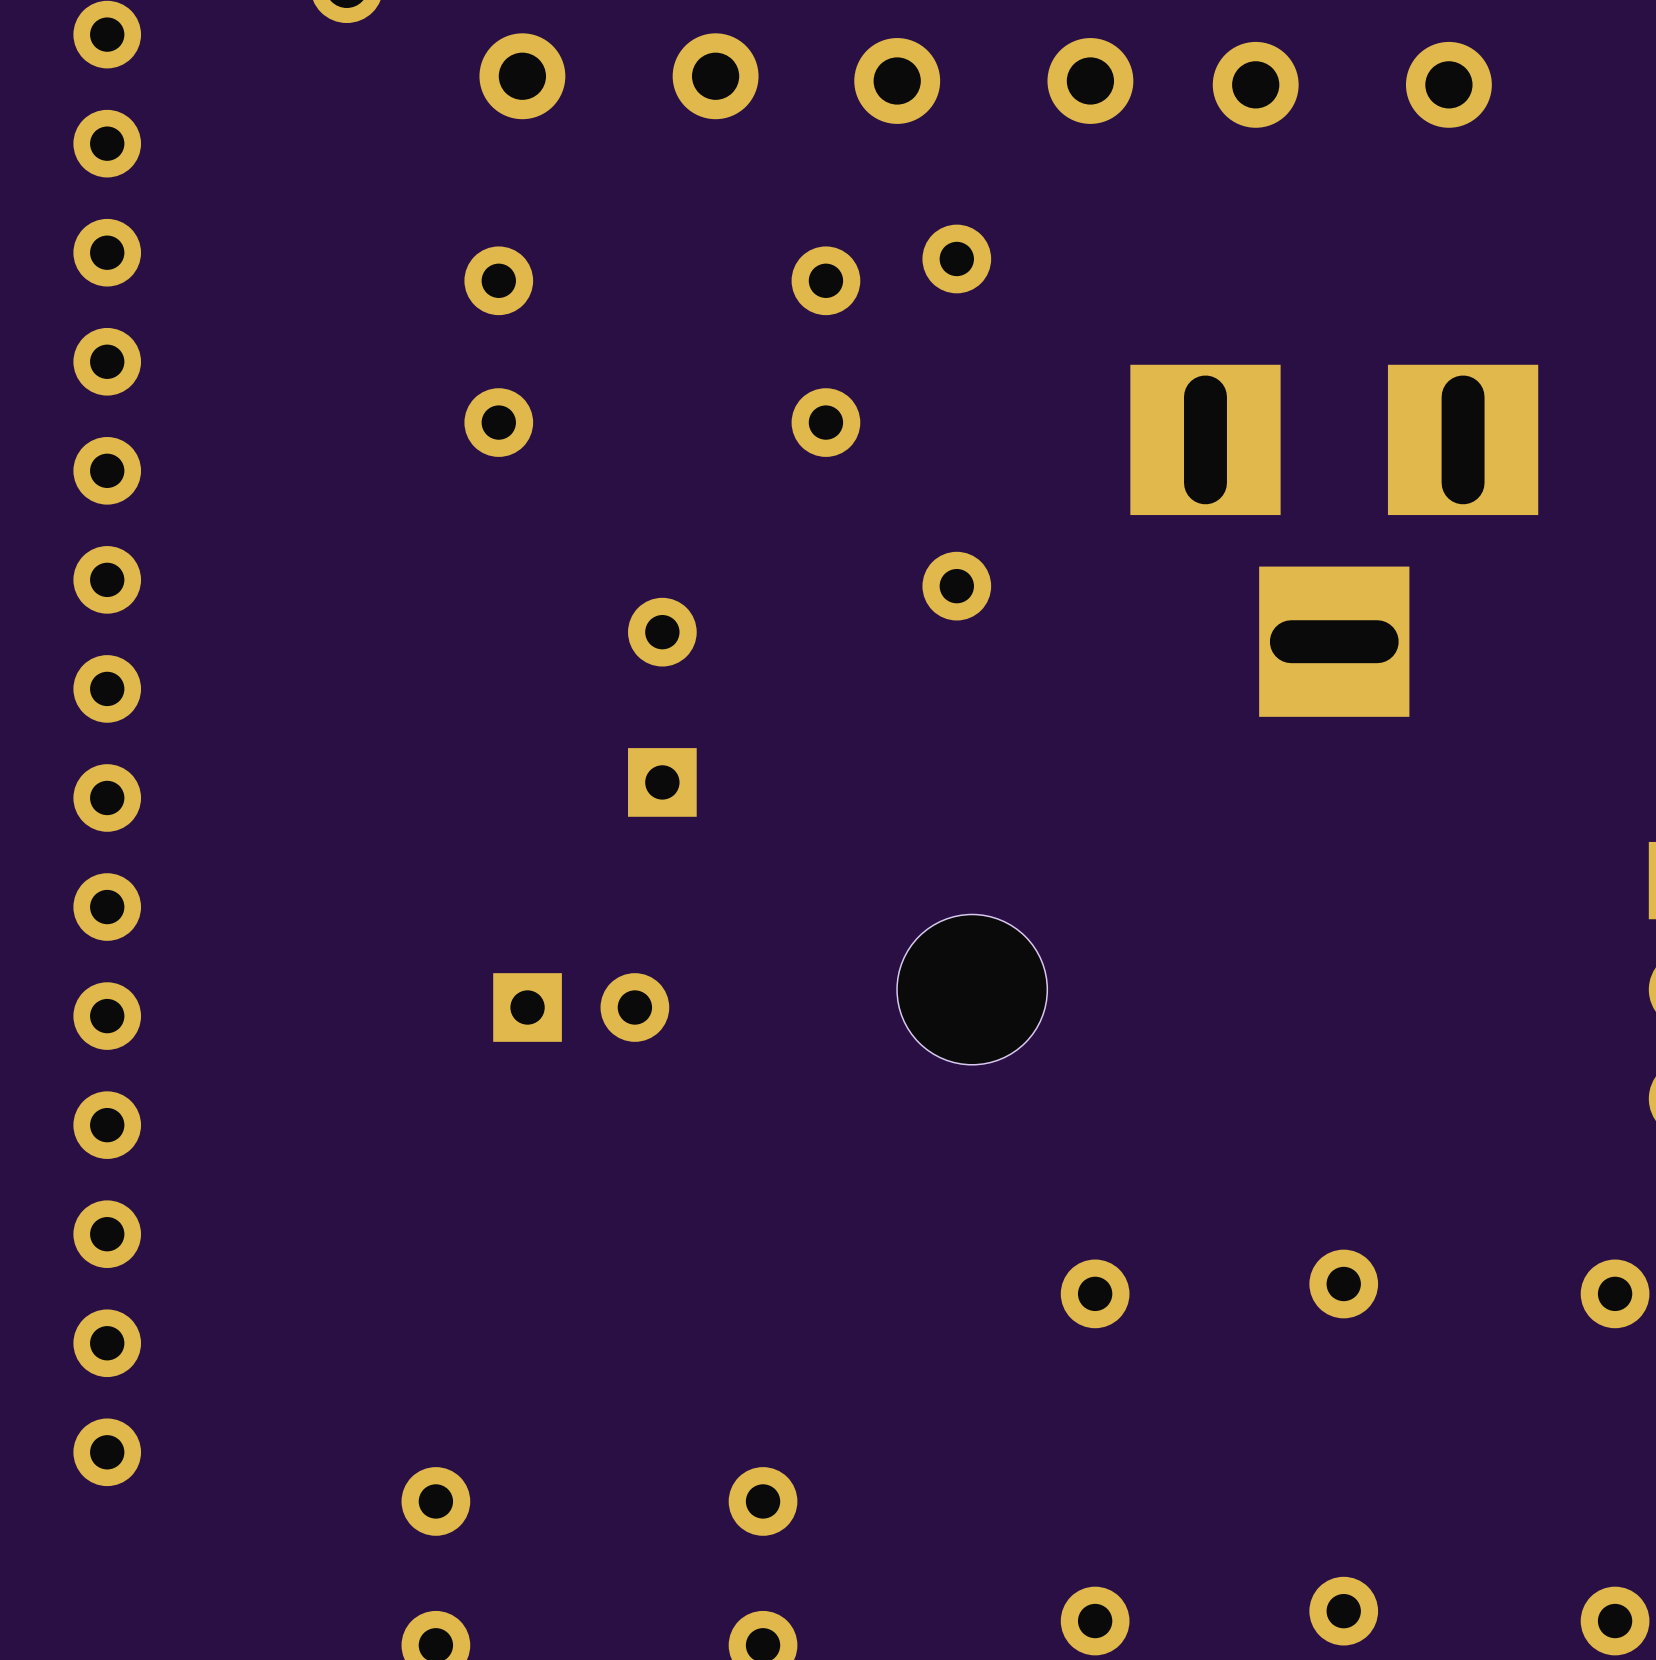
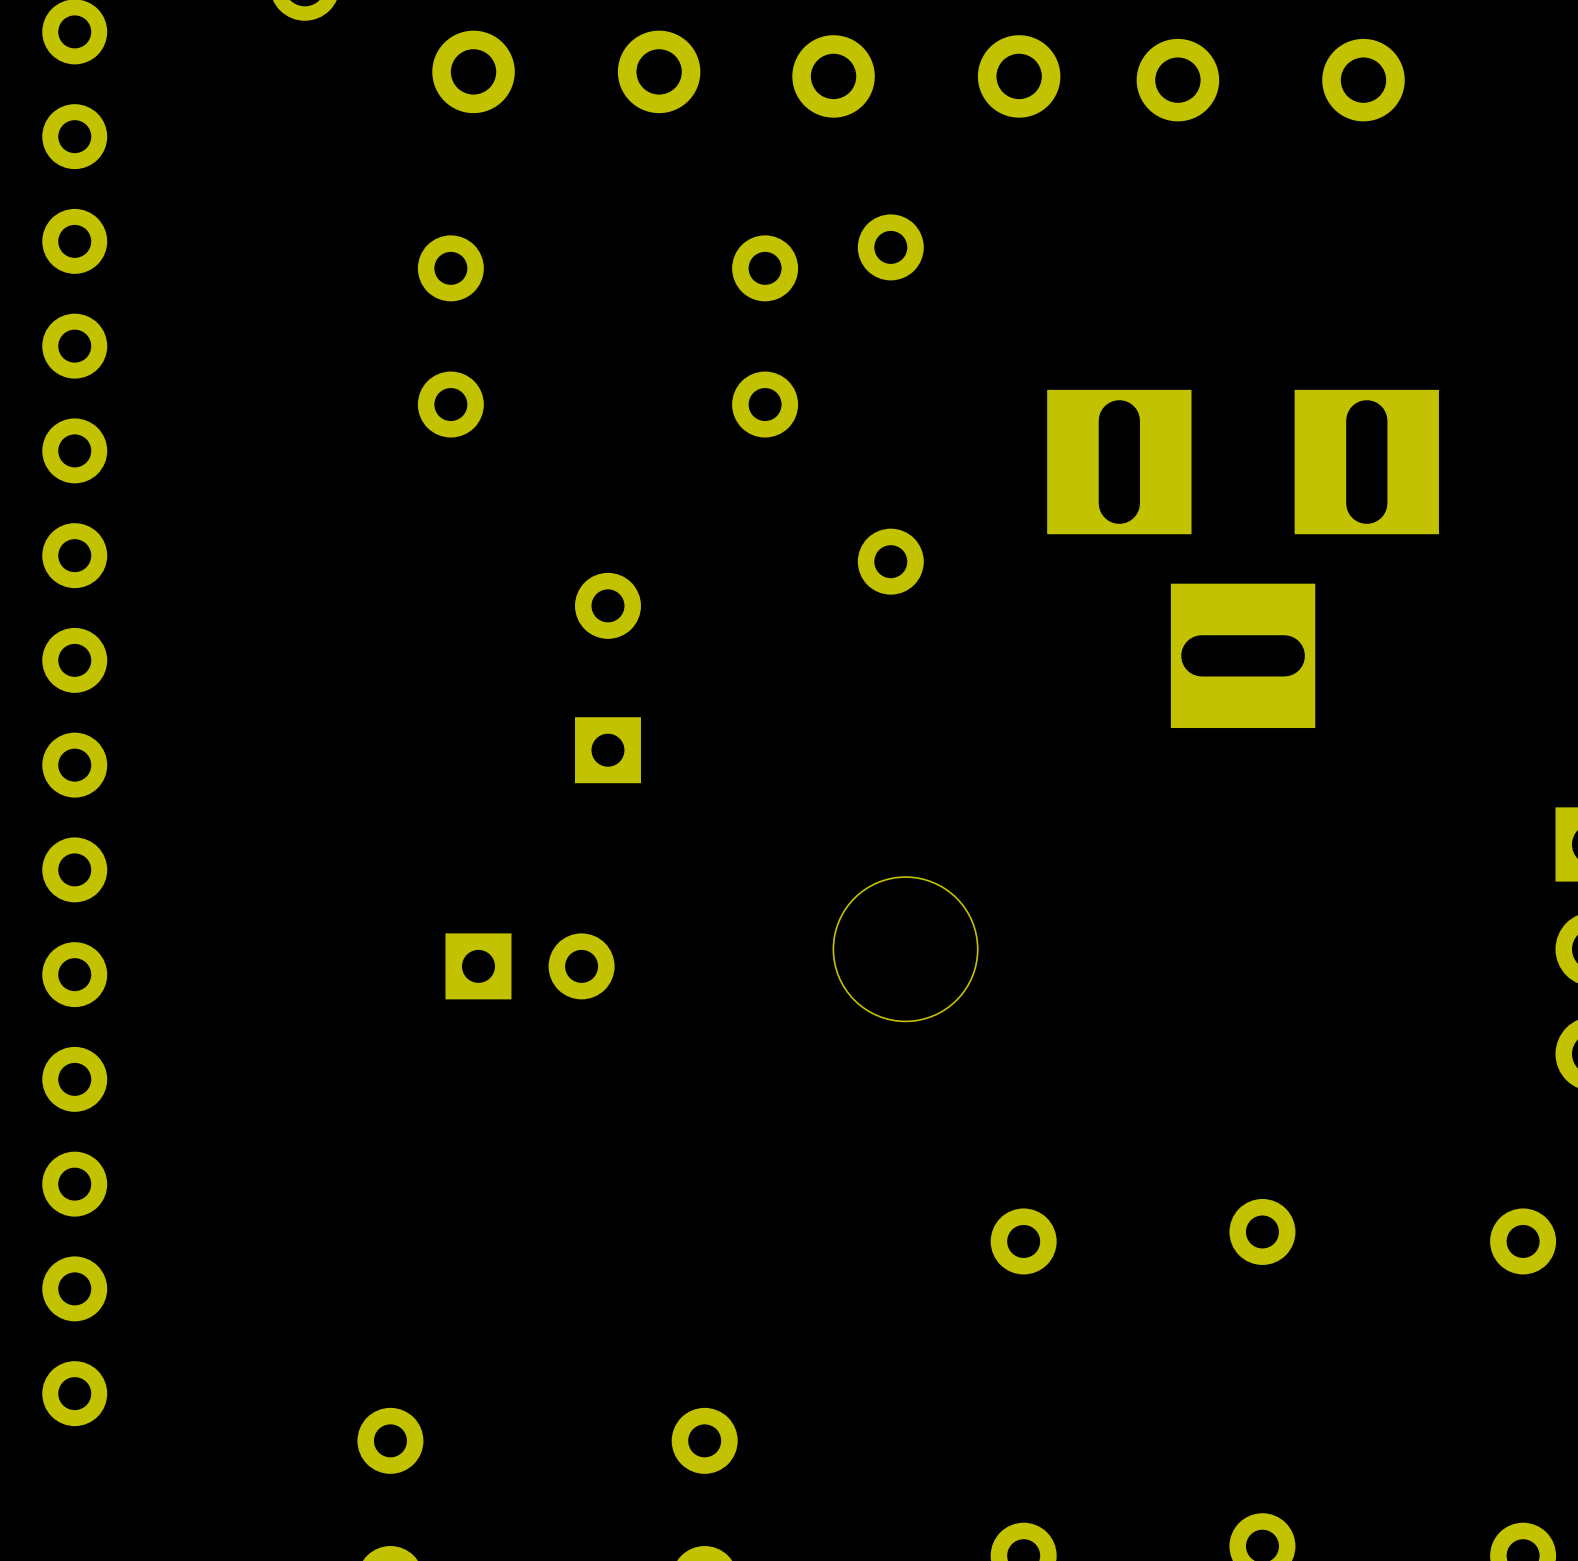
part position: (1334, 540) -> (1243, 558)

